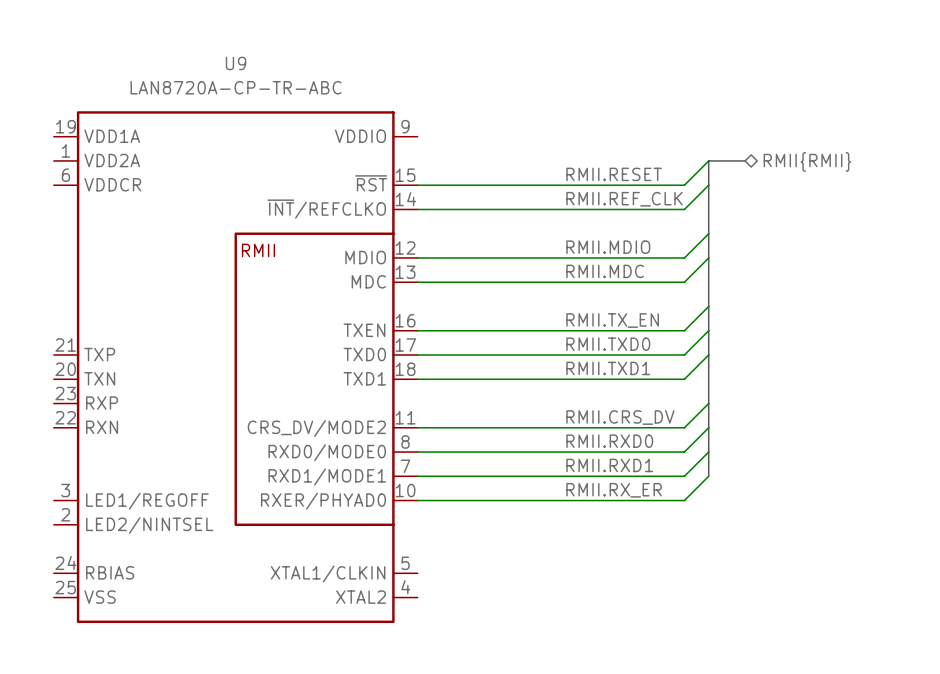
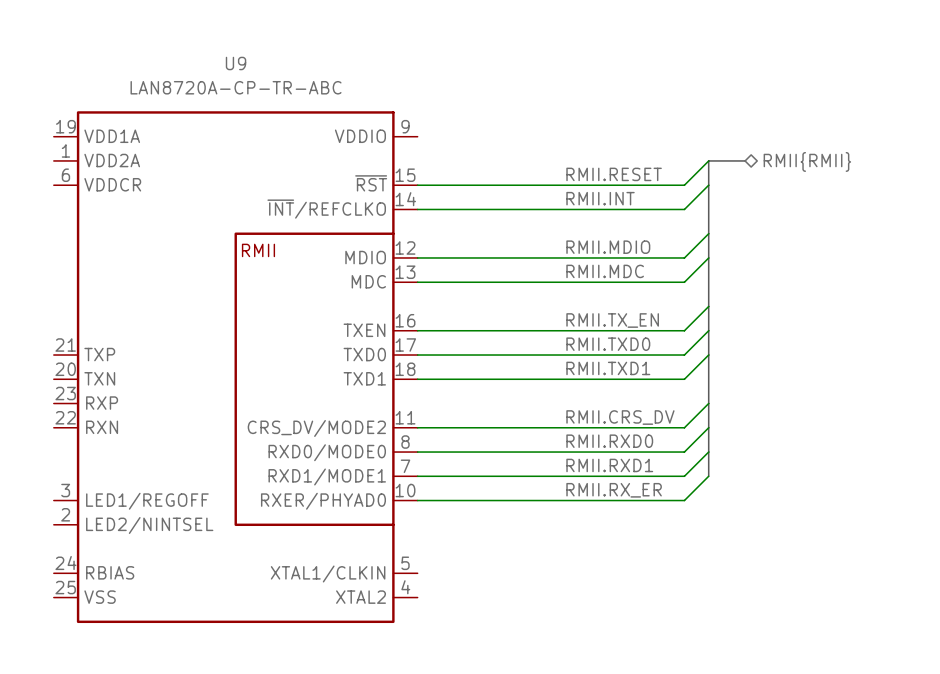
label: RMII.REF_CLK (624, 199) -> RMII.INT (600, 198)

